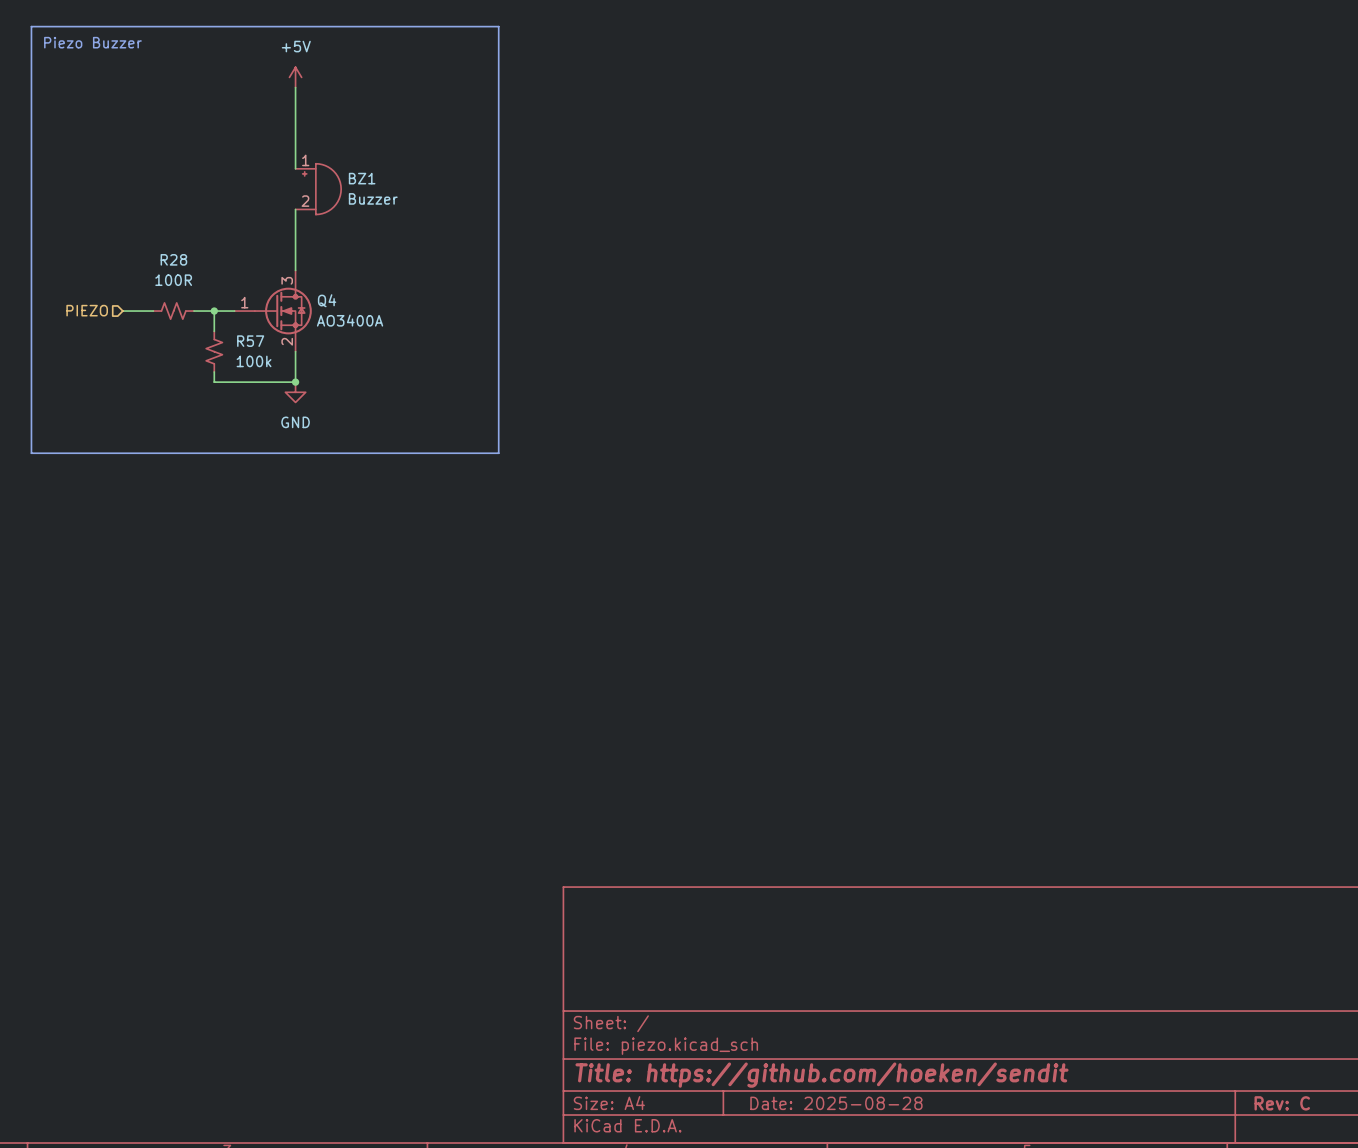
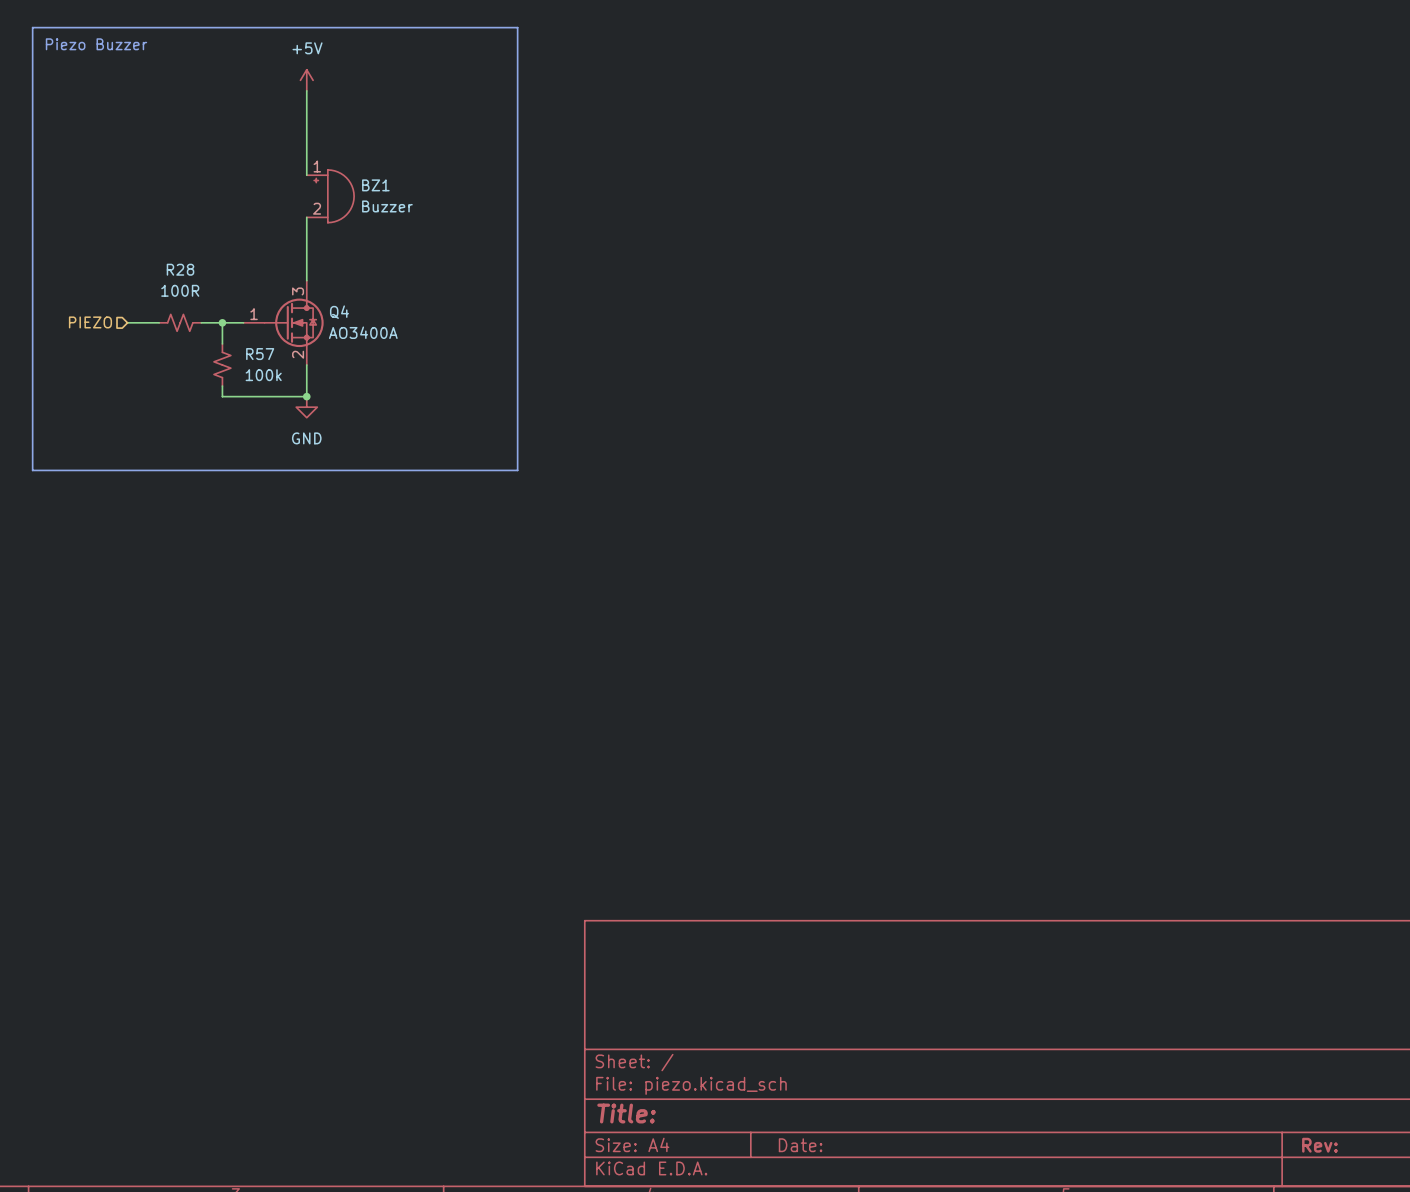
title block: Title: https://github.com/hoeken/sendit (821, 1075) -> Title: (626, 1113)
title block: Date: 2025-08-28 (836, 1103) -> Date: (800, 1145)
title block: Rev: C (1282, 1103) -> Rev: (1319, 1145)

